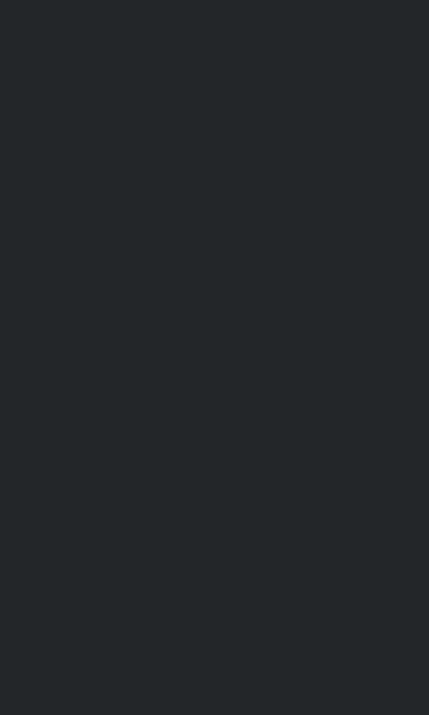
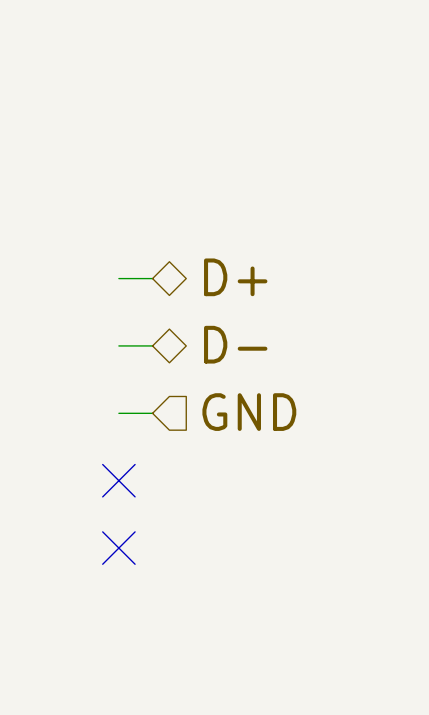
hierarchical label: none -> D+ (235, 277)
wire: none -> (118, 278) (152, 278)
hierarchical label: none -> D- (235, 344)
wire: none -> (118, 345) (152, 345)
hierarchical label: none -> GND (249, 412)
wire: none -> (118, 413) (152, 413)
no-connect mark: none -> (118, 480)
no-connect mark: none -> (118, 548)

